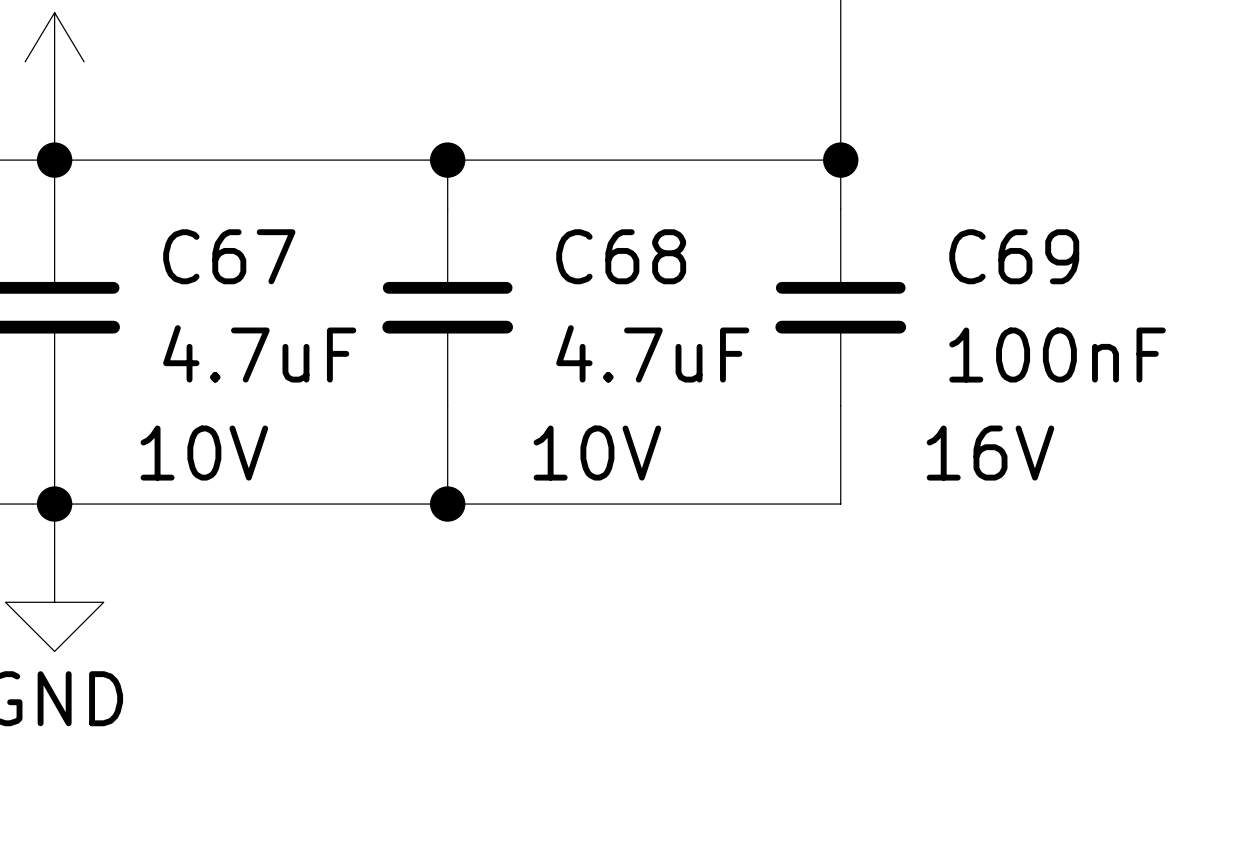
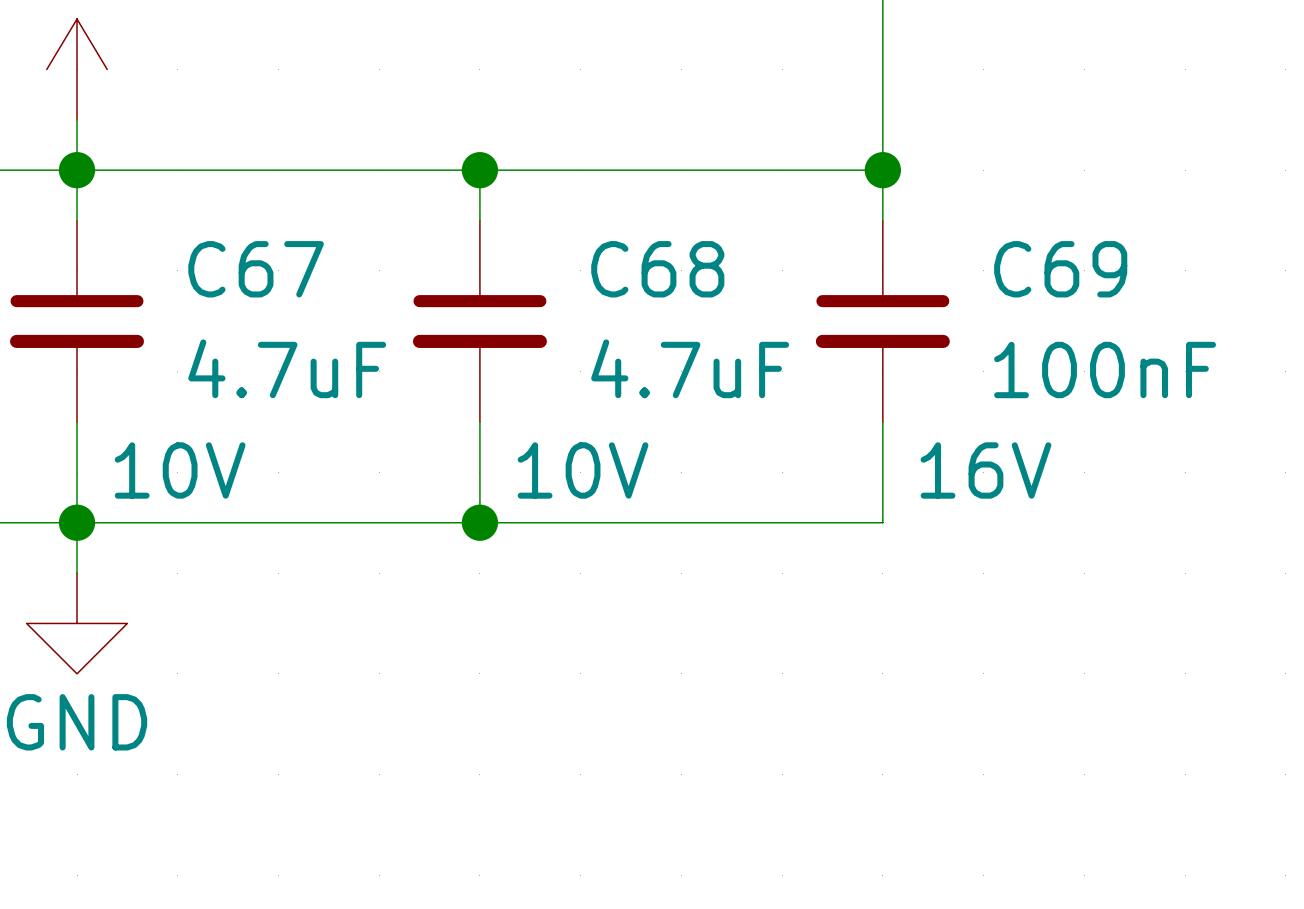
C67 text position: 10V (204, 453) -> 10V (180, 470)
C68 text position: 10V (597, 453) -> 10V (583, 470)
C69 text position: 16V (990, 453) -> 16V (985, 470)

